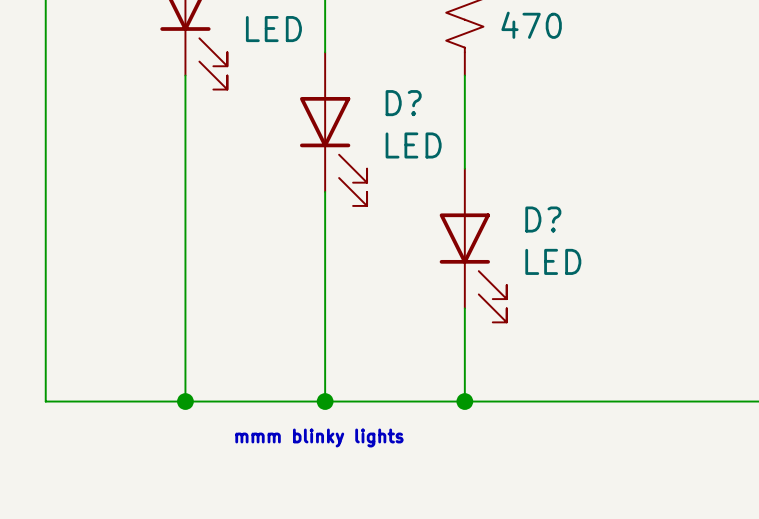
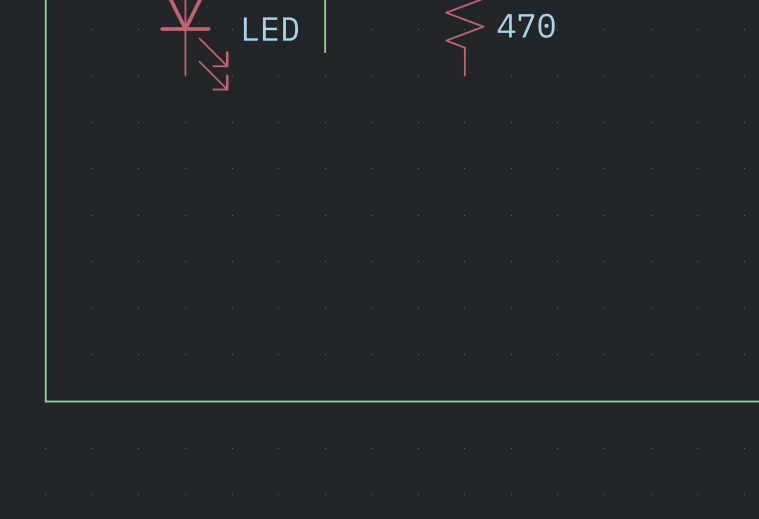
wire: (185, 75) (185, 401) -> none
wire: (464, 75) (464, 168) -> none
D?: LED (333, 129) -> none
wire: (325, 191) (325, 401) -> none
D?: LED (473, 245) -> none
wire: (464, 308) (464, 401) -> none
junction: (185, 401) -> none
junction: (325, 401) -> none
junction: (464, 401) -> none
text: mmm blinky lights (319, 437) -> none

